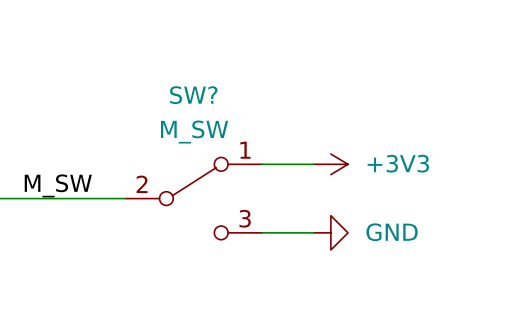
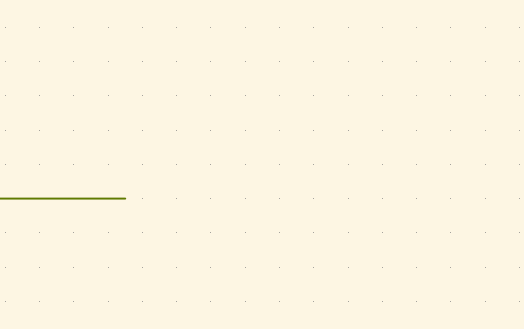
wire: (262, 164) (313, 164) -> none
power symbol: +3V3 (330, 164) -> none
label: M_SW (58, 185) -> none
SW?: M_SW (193, 198) -> none
wire: (262, 232) (313, 232) -> none
power symbol: GND (330, 232) -> none

